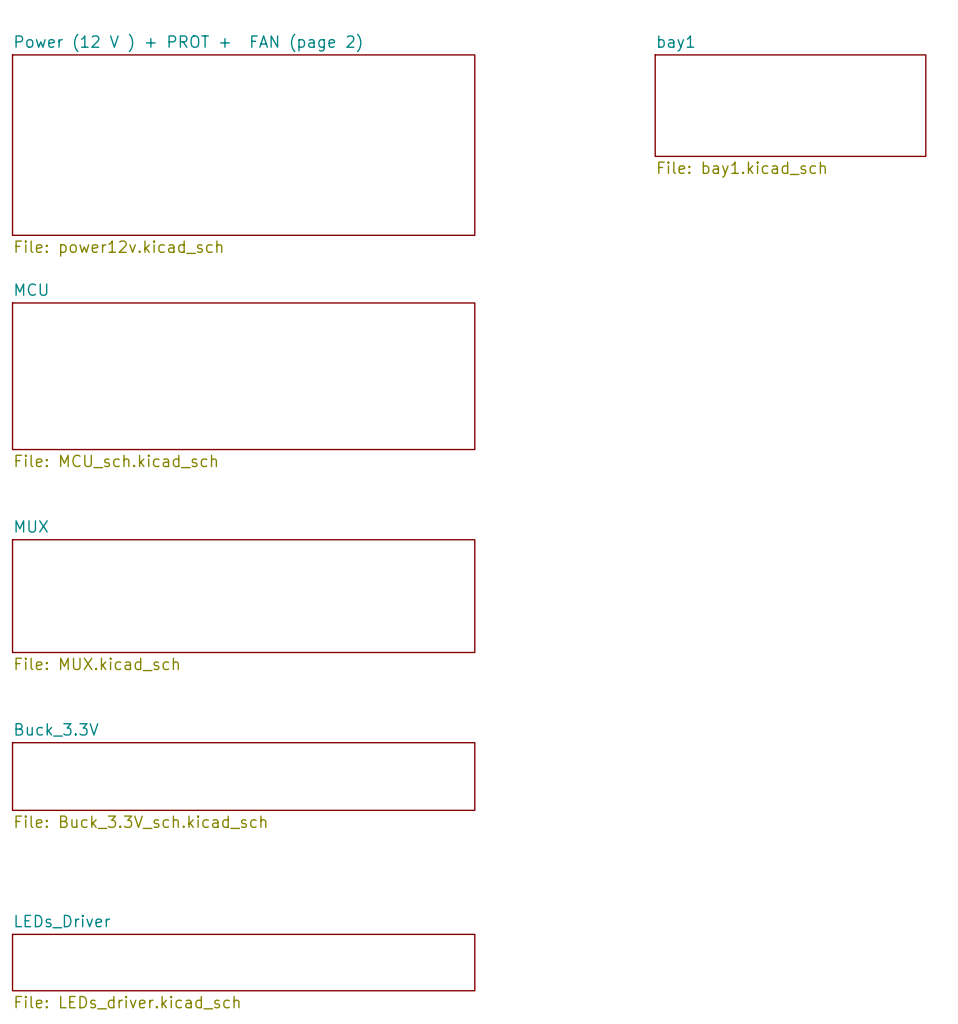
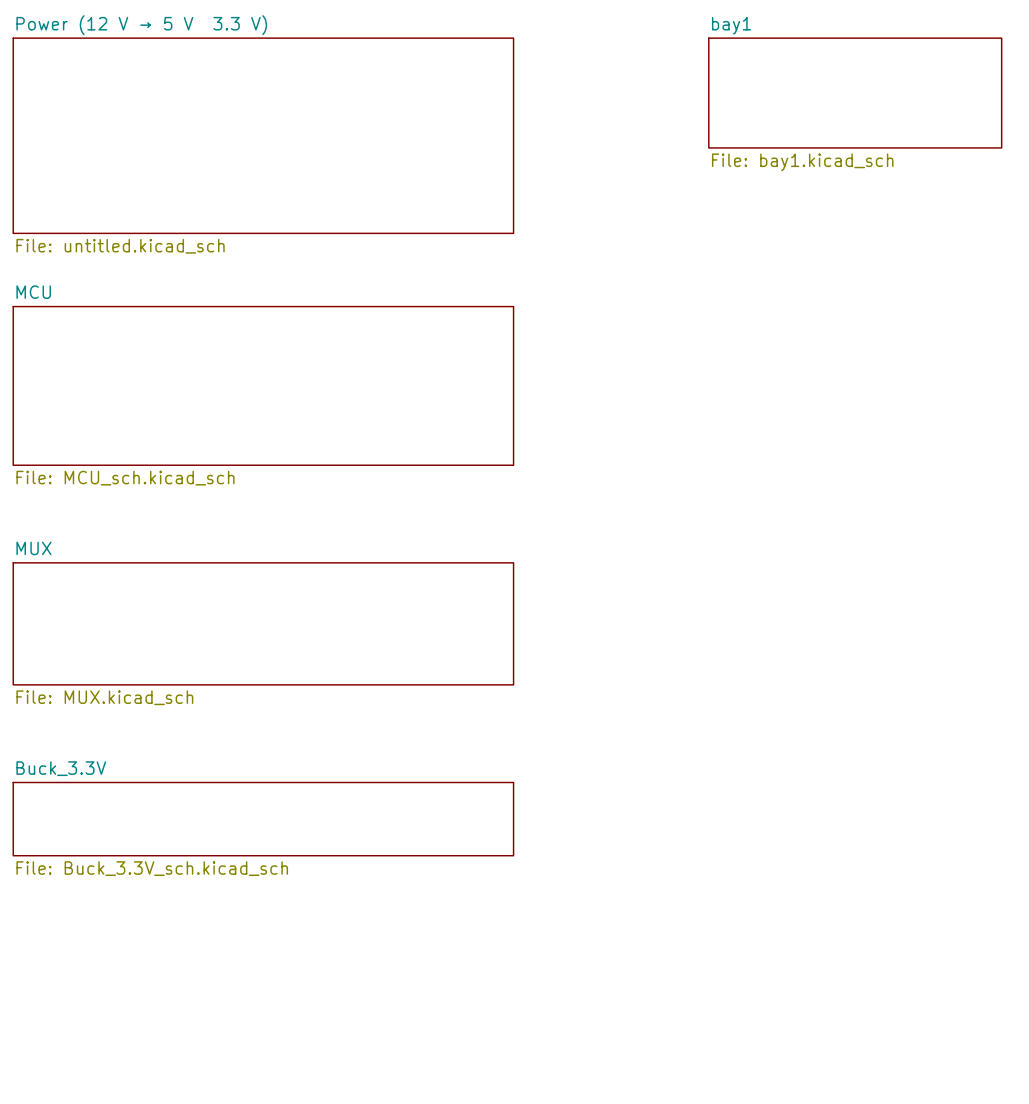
sheet Power (12 V ) + PROT + FAN (page 2) name: Power (12 V ) + PROT + FAN (page 2) (188, 42) -> Power (12 V → 5 V 3.3 V) (141, 25)
sheet Power (12 V ) + PROT + FAN (page 2) value: File: power12v.kicad_sch (118, 248) -> File: untitled.kicad_sch (120, 246)
sheet LEDs_Driver: File: LEDs_driver.kicad_sch (243, 962) -> none

